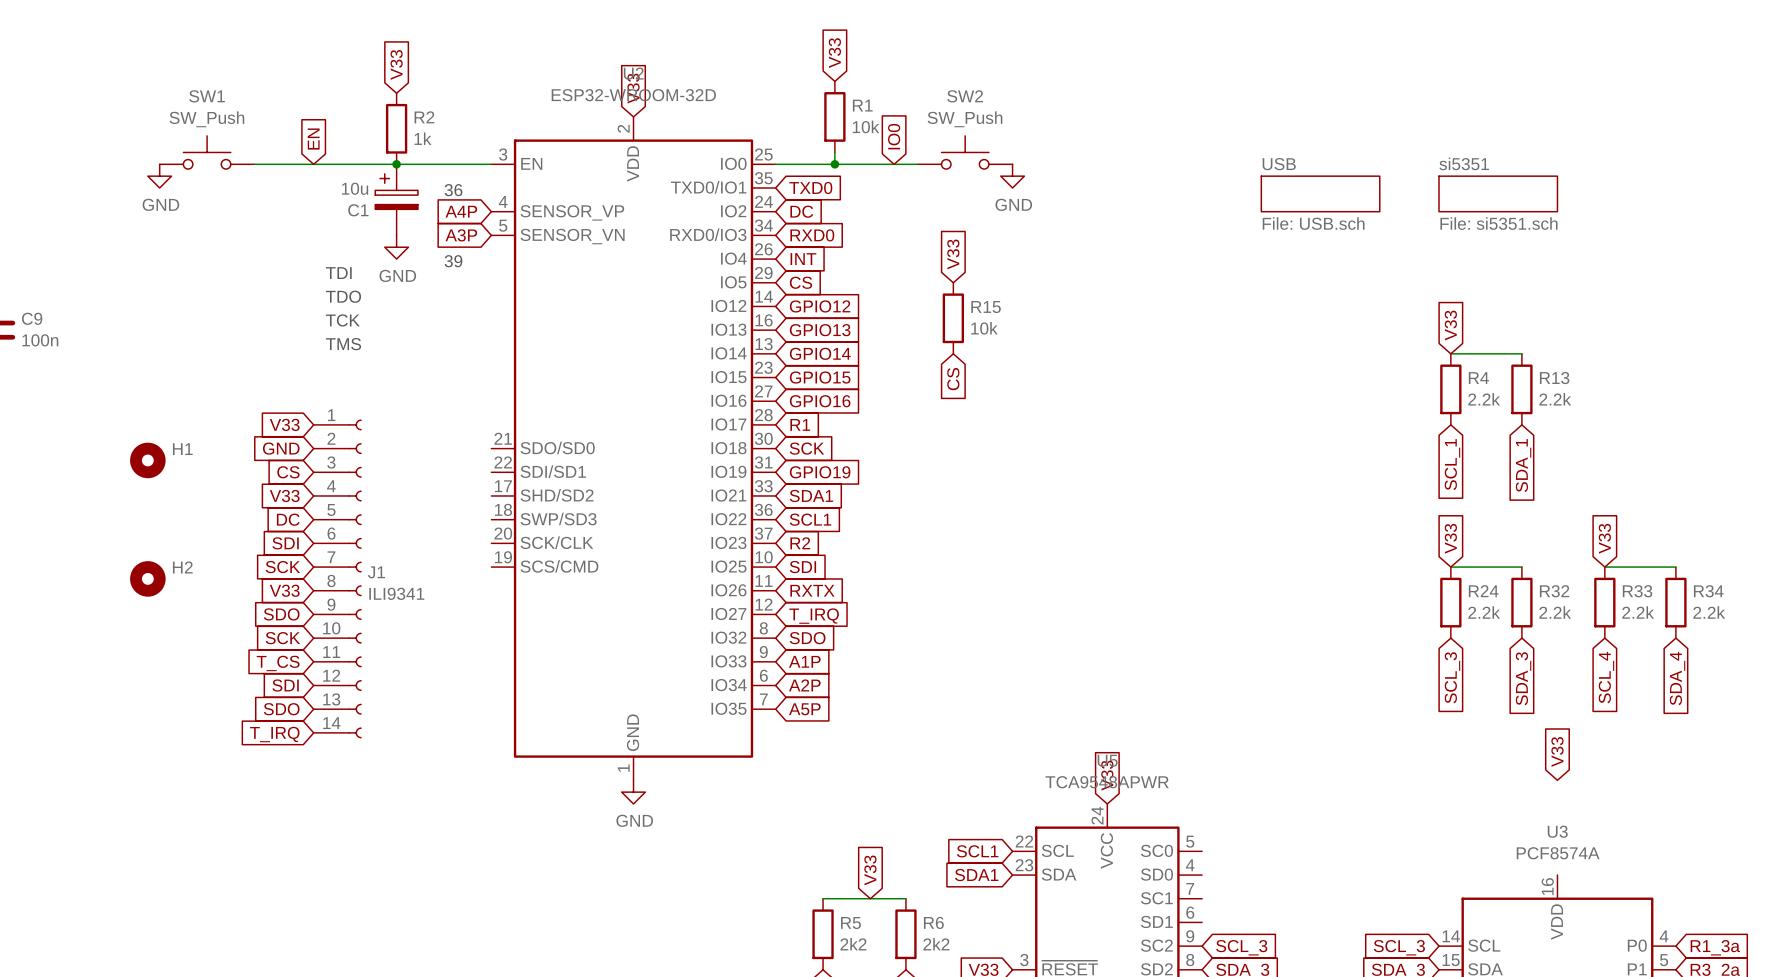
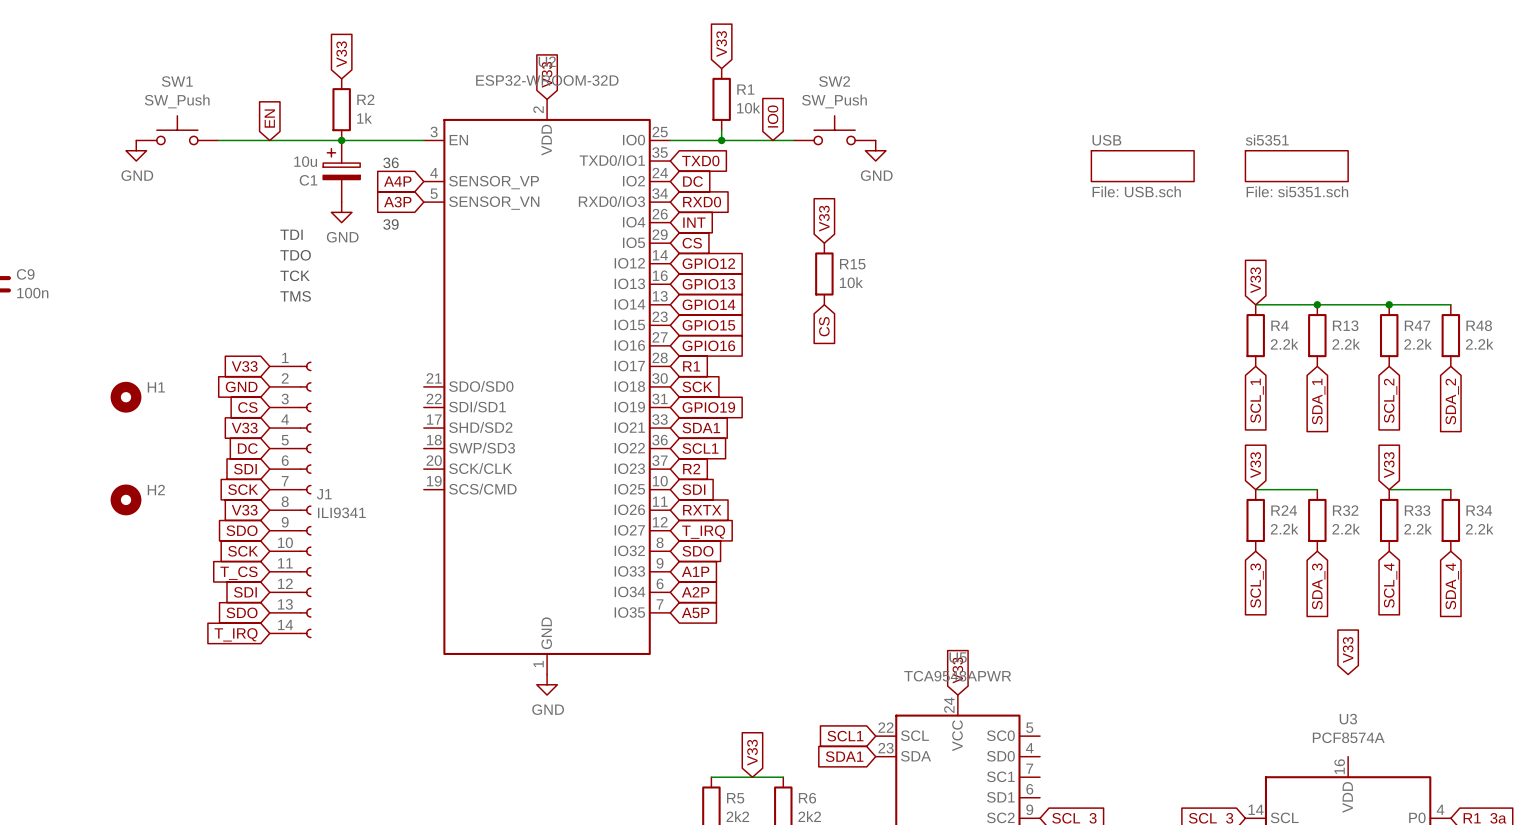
wire: none -> (1317, 304) (1450, 304)
junction: none -> (1317, 304)
junction: none -> (1389, 304)
R47: none -> 2.2k (1389, 335)
R48: none -> 2.2k (1450, 335)
global label: none -> SCL_2 (1390, 400)
global label: none -> SDA_2 (1452, 401)

